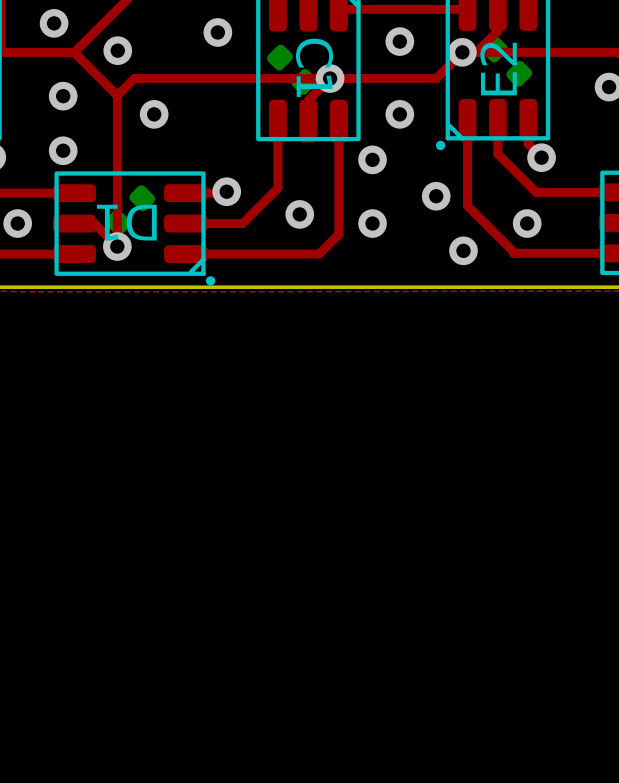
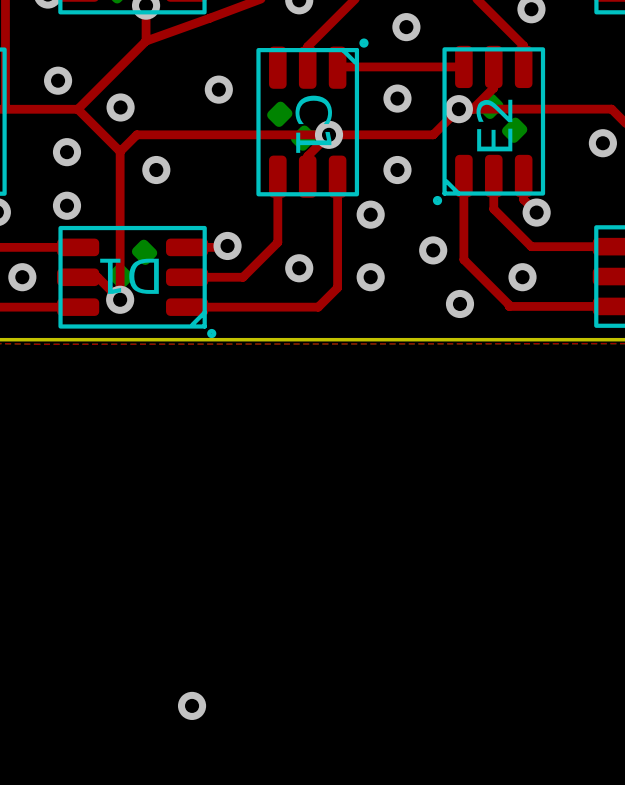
via: none -> (192, 705)

